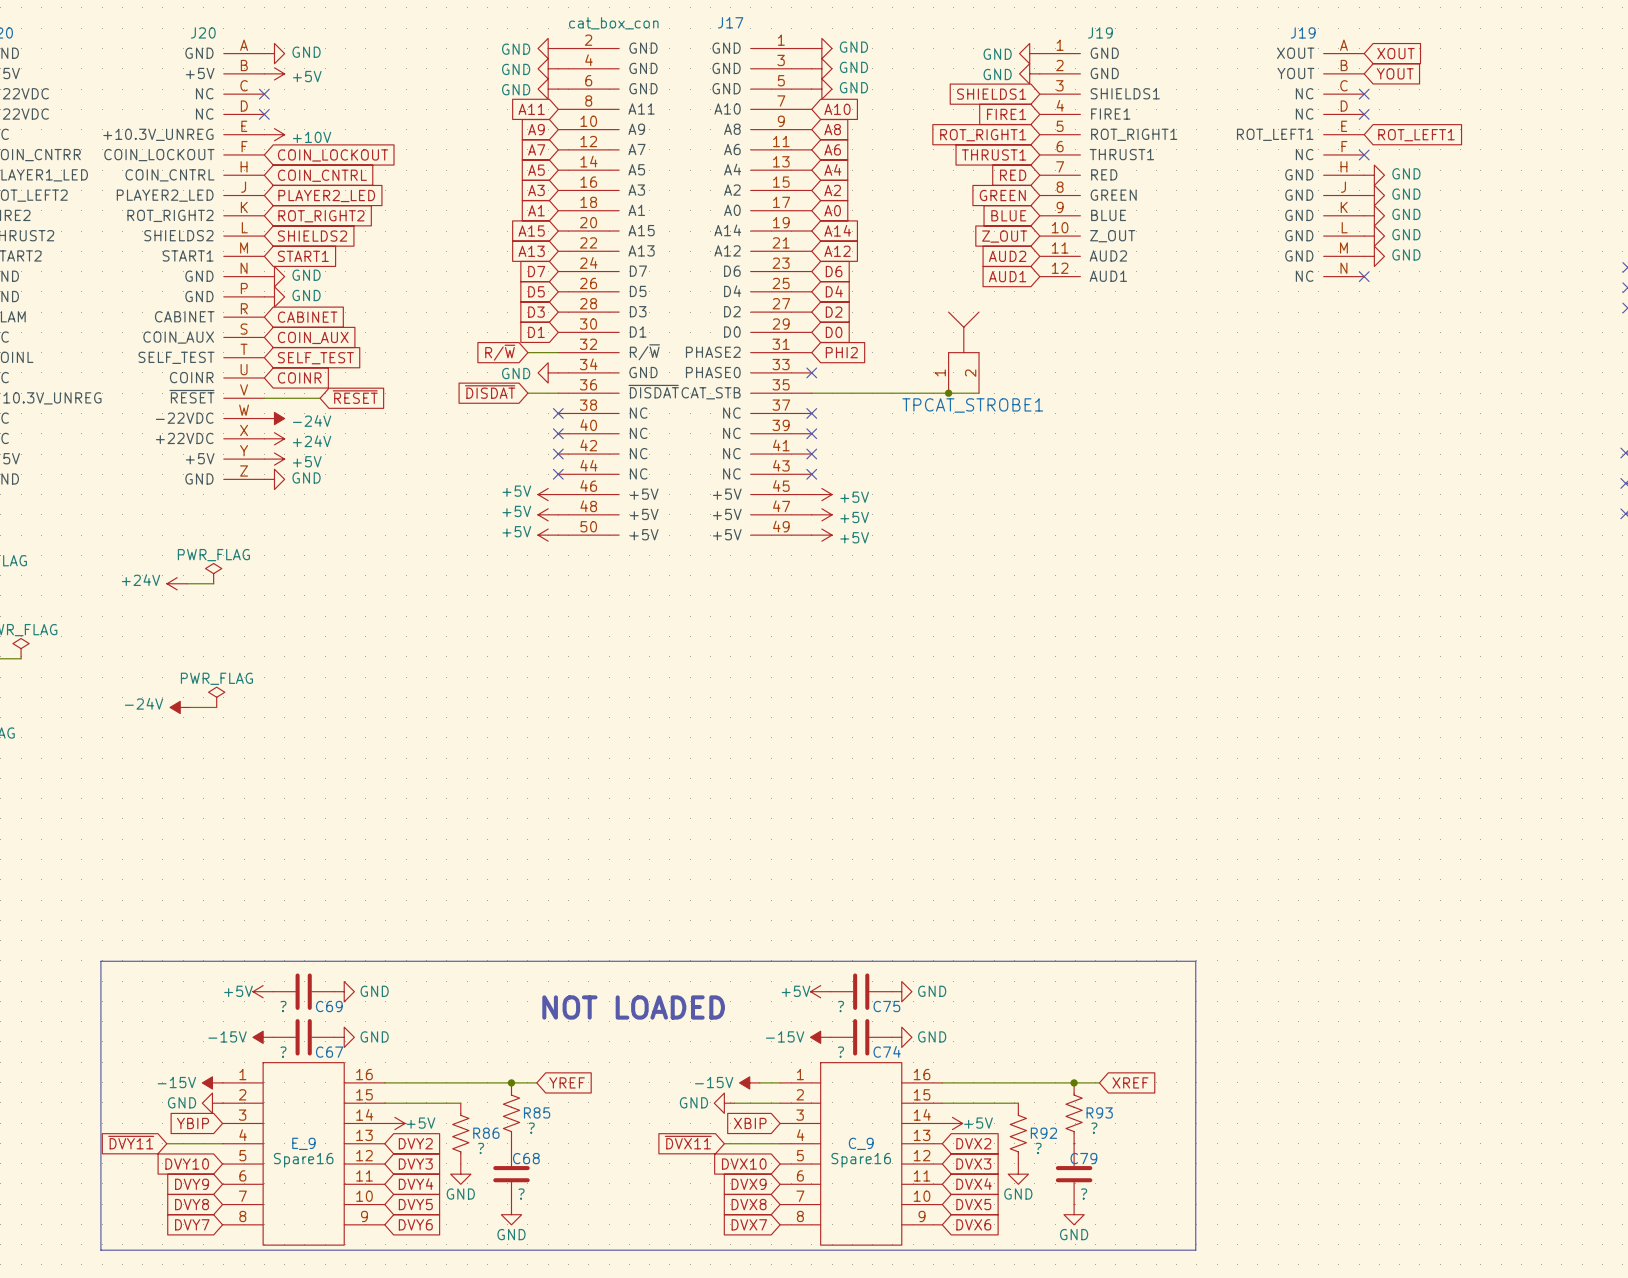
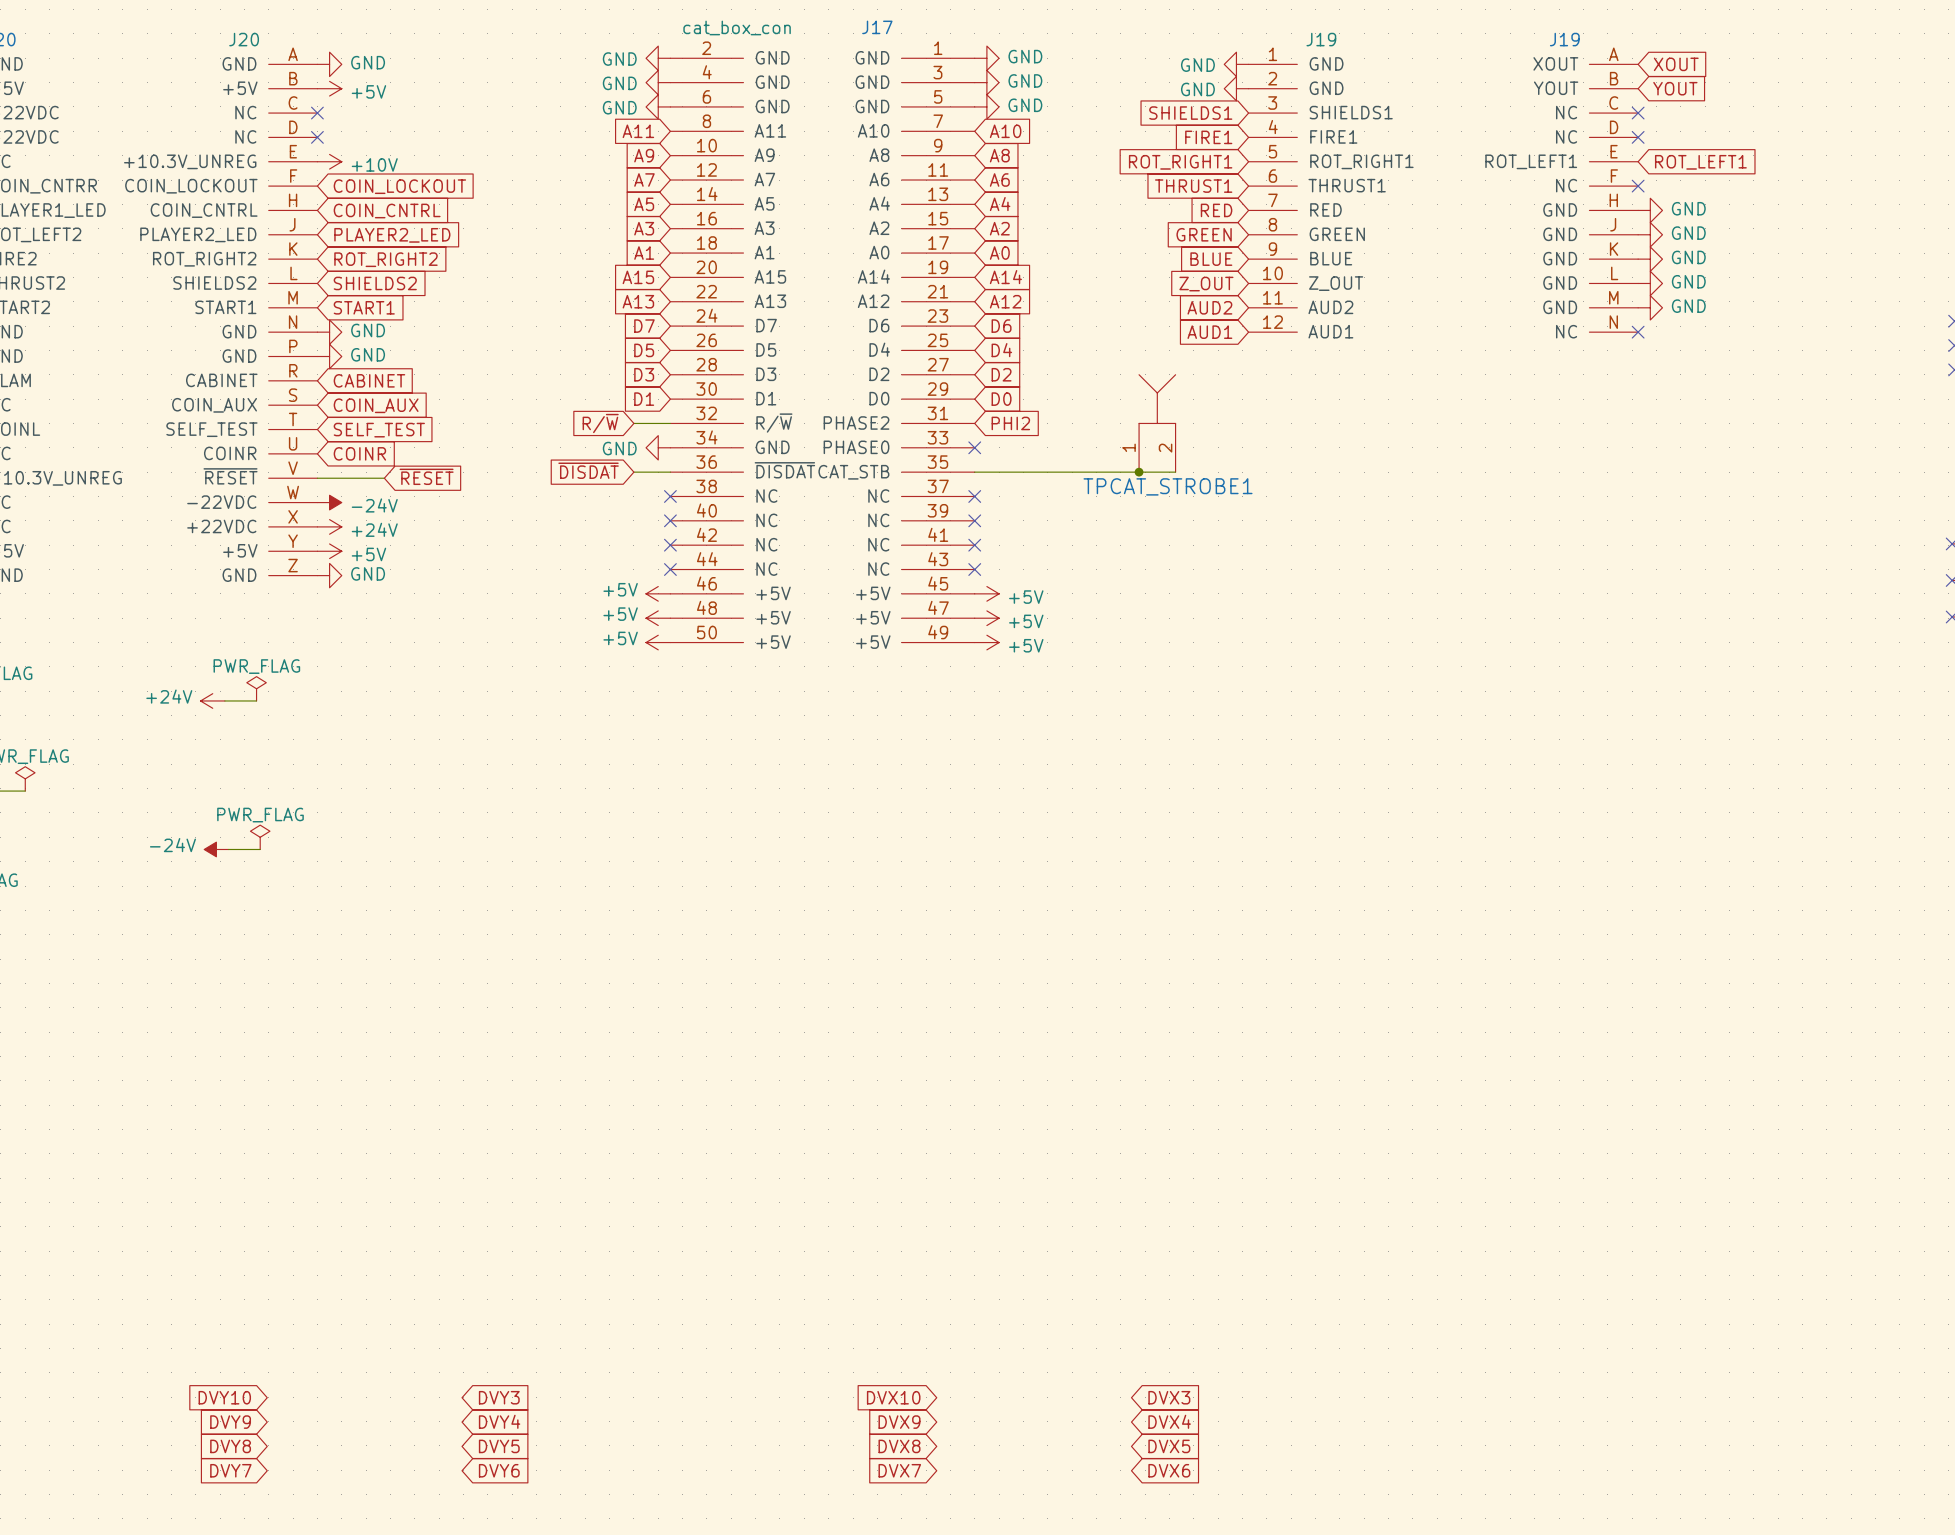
line: (100, 961) (100, 1250) (1195, 1250) (1195, 961) (100, 961) -> none
power symbol: +5V (263, 991) -> none
C69: ? (303, 991) -> none
power symbol: GND (344, 991) -> none
power symbol: +5V (820, 991) -> none
C75: ? (861, 991) -> none
power symbol: GND (901, 991) -> none
text: NOT LOADED (633, 1007) -> none
power symbol: -15V (263, 1037) -> none
C67: ? (303, 1037) -> none
power symbol: GND (344, 1037) -> none
power symbol: -15V (820, 1037) -> none
C74: ? (861, 1037) -> none
power symbol: GND (901, 1037) -> none
power symbol: -15V (212, 1082) -> none
wire: (384, 1082) (536, 1082) -> none
junction: (511, 1082) -> none
global label: YREF (567, 1082) -> none
power symbol: -15V (749, 1082) -> none
wire: (759, 1082) (780, 1082) -> none
wire: (942, 1082) (1099, 1082) -> none
junction: (1074, 1082) -> none
global label: XREF (1130, 1082) -> none
power symbol: GND (212, 1103) -> none
wire: (384, 1103) (460, 1103) -> none
power symbol: GND (724, 1103) -> none
wire: (734, 1103) (780, 1103) -> none
wire: (942, 1103) (1018, 1103) -> none
R85: ? (511, 1113) -> none
R93: ? (1074, 1113) -> none
global label: YBIP (192, 1123) -> none
power symbol: +5V (394, 1123) -> none
global label: XBIP (750, 1123) -> none
power symbol: +5V (952, 1123) -> none
R86: ? (460, 1133) -> none
R92: ? (1018, 1133) -> none
global label: ~{DVY11} (131, 1142) -> none
global label: ~{DVX11} (688, 1142) -> none
wire: (166, 1143) (222, 1143) -> none
global label: DVY2 (415, 1143) -> none
wire: (724, 1143) (780, 1143) -> none
global label: DVX2 (973, 1143) -> none
E_9: Spare16 (303, 1153) -> none
C_9: Spare16 (861, 1153) -> none
power symbol: GND (460, 1174) -> none
C68: ? (511, 1174) -> none
power symbol: GND (1018, 1174) -> none
C79: ? (1074, 1174) -> none
power symbol: GND (511, 1214) -> none
power symbol: GND (1074, 1214) -> none

